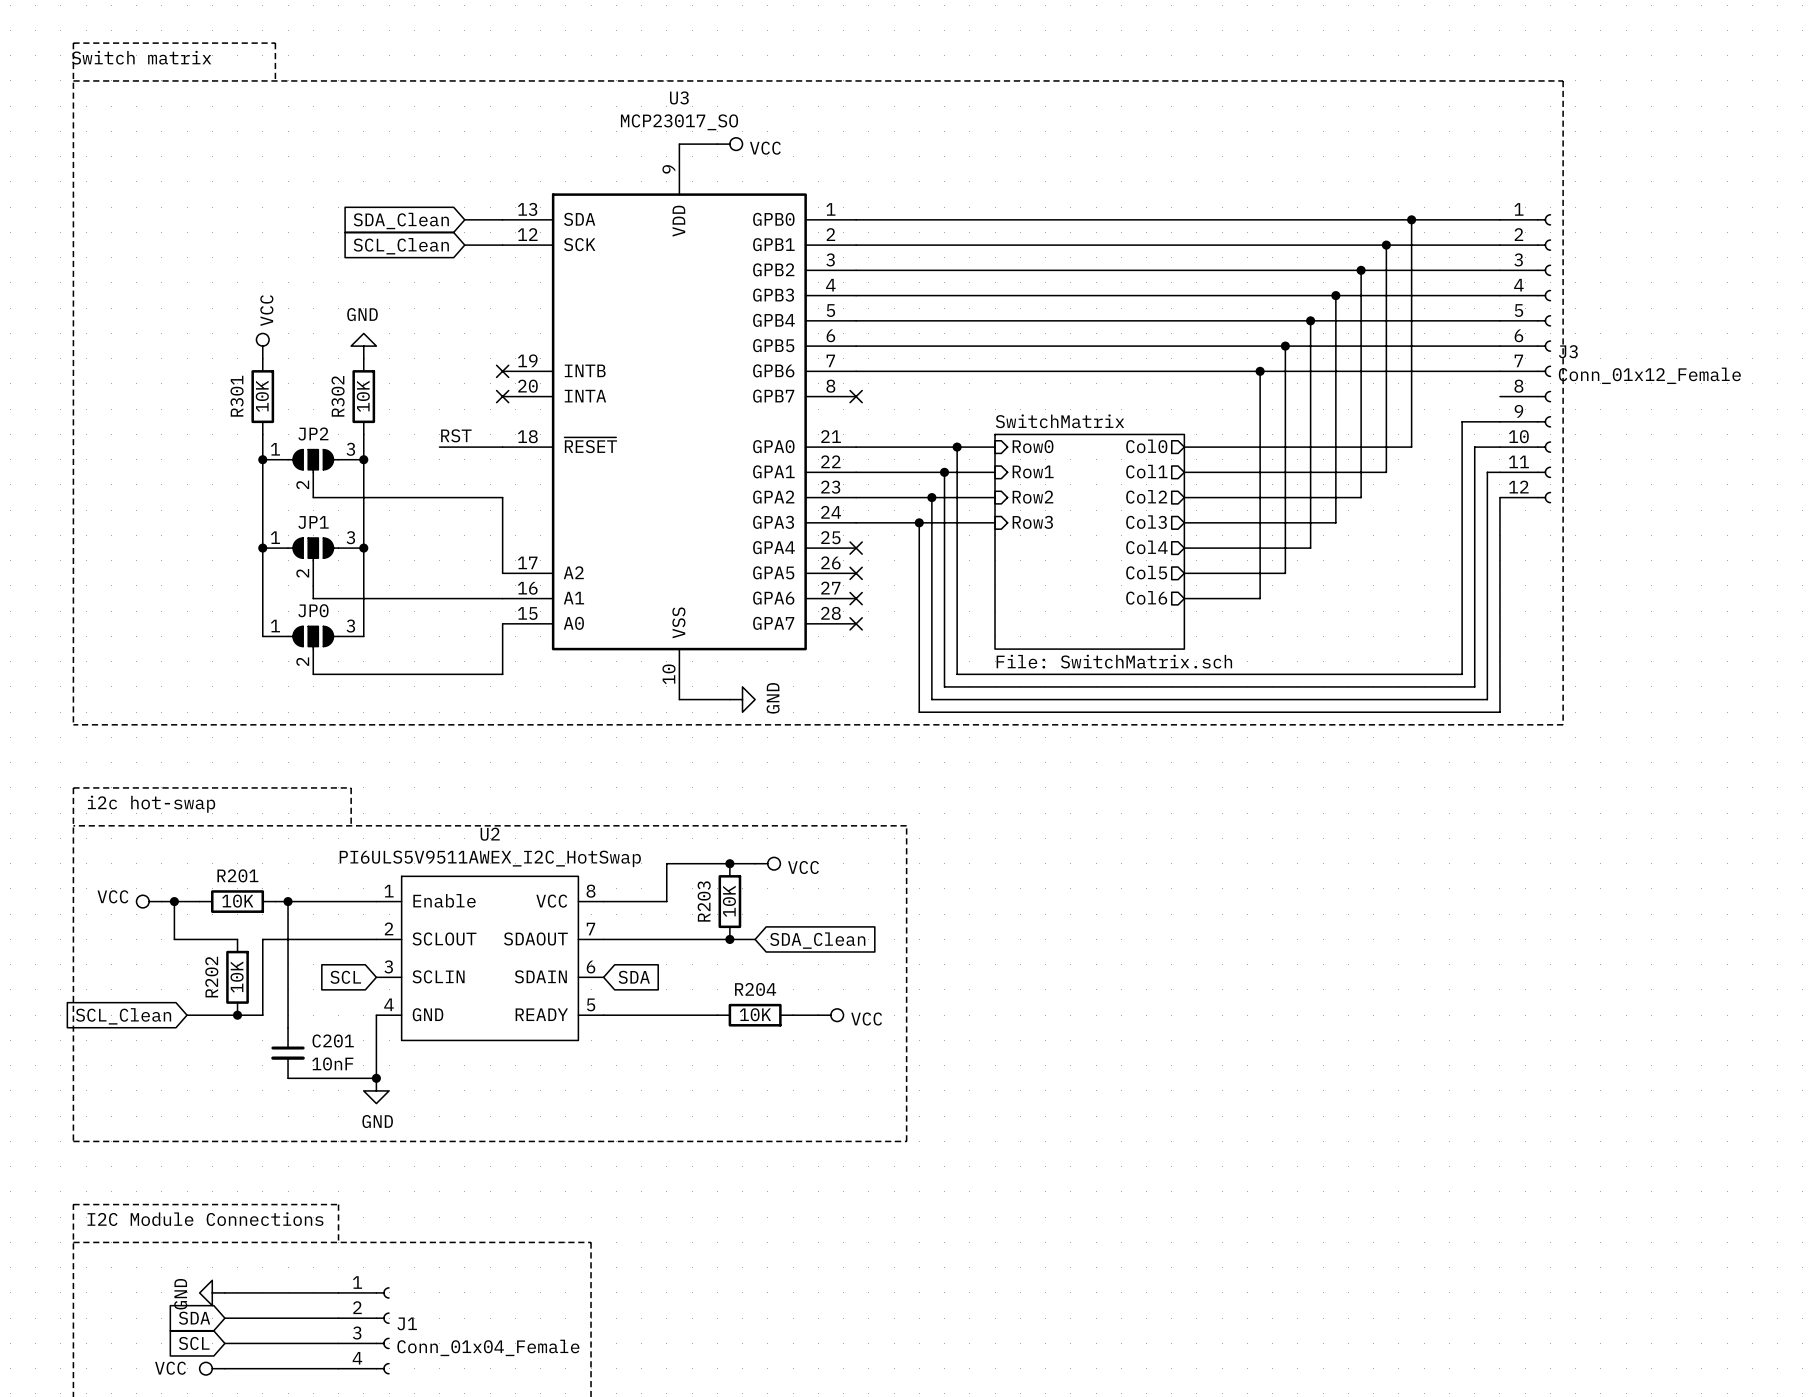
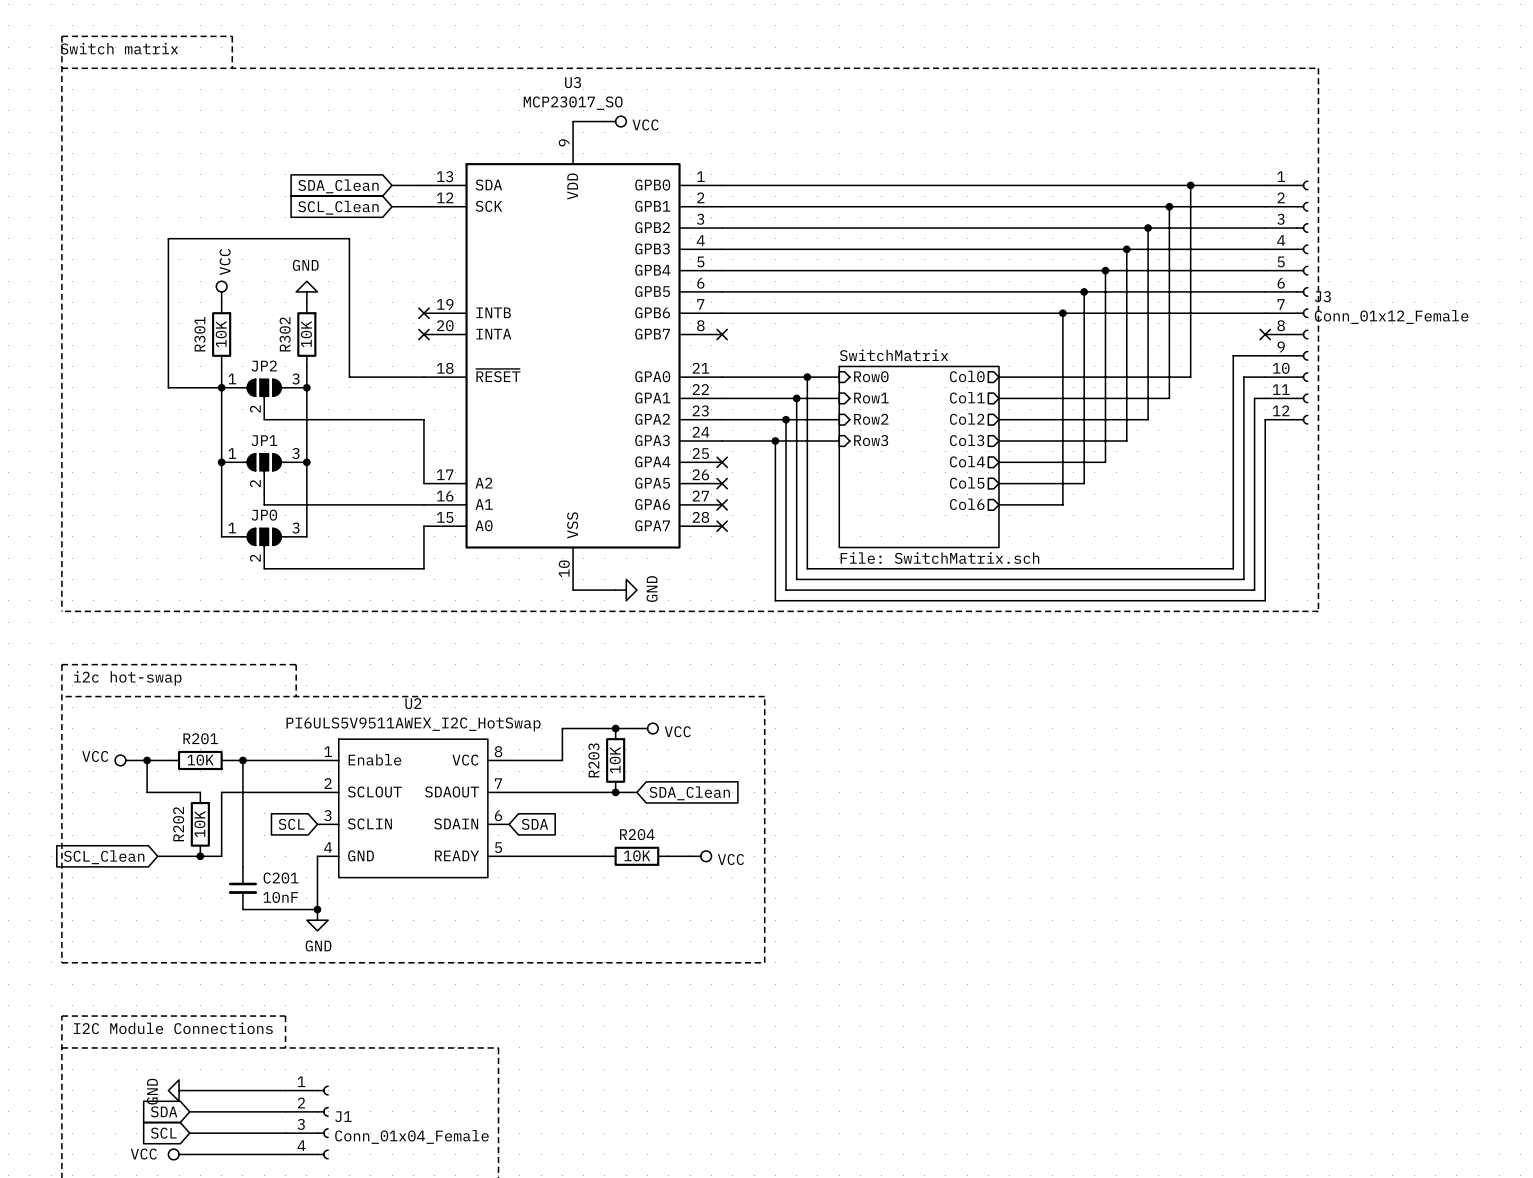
no-connect mark: none -> (1265, 334)
label: RST (456, 435) -> none
wire: none -> (370, 377) (349, 377) (349, 238) (168, 238) (168, 387) (221, 387)

